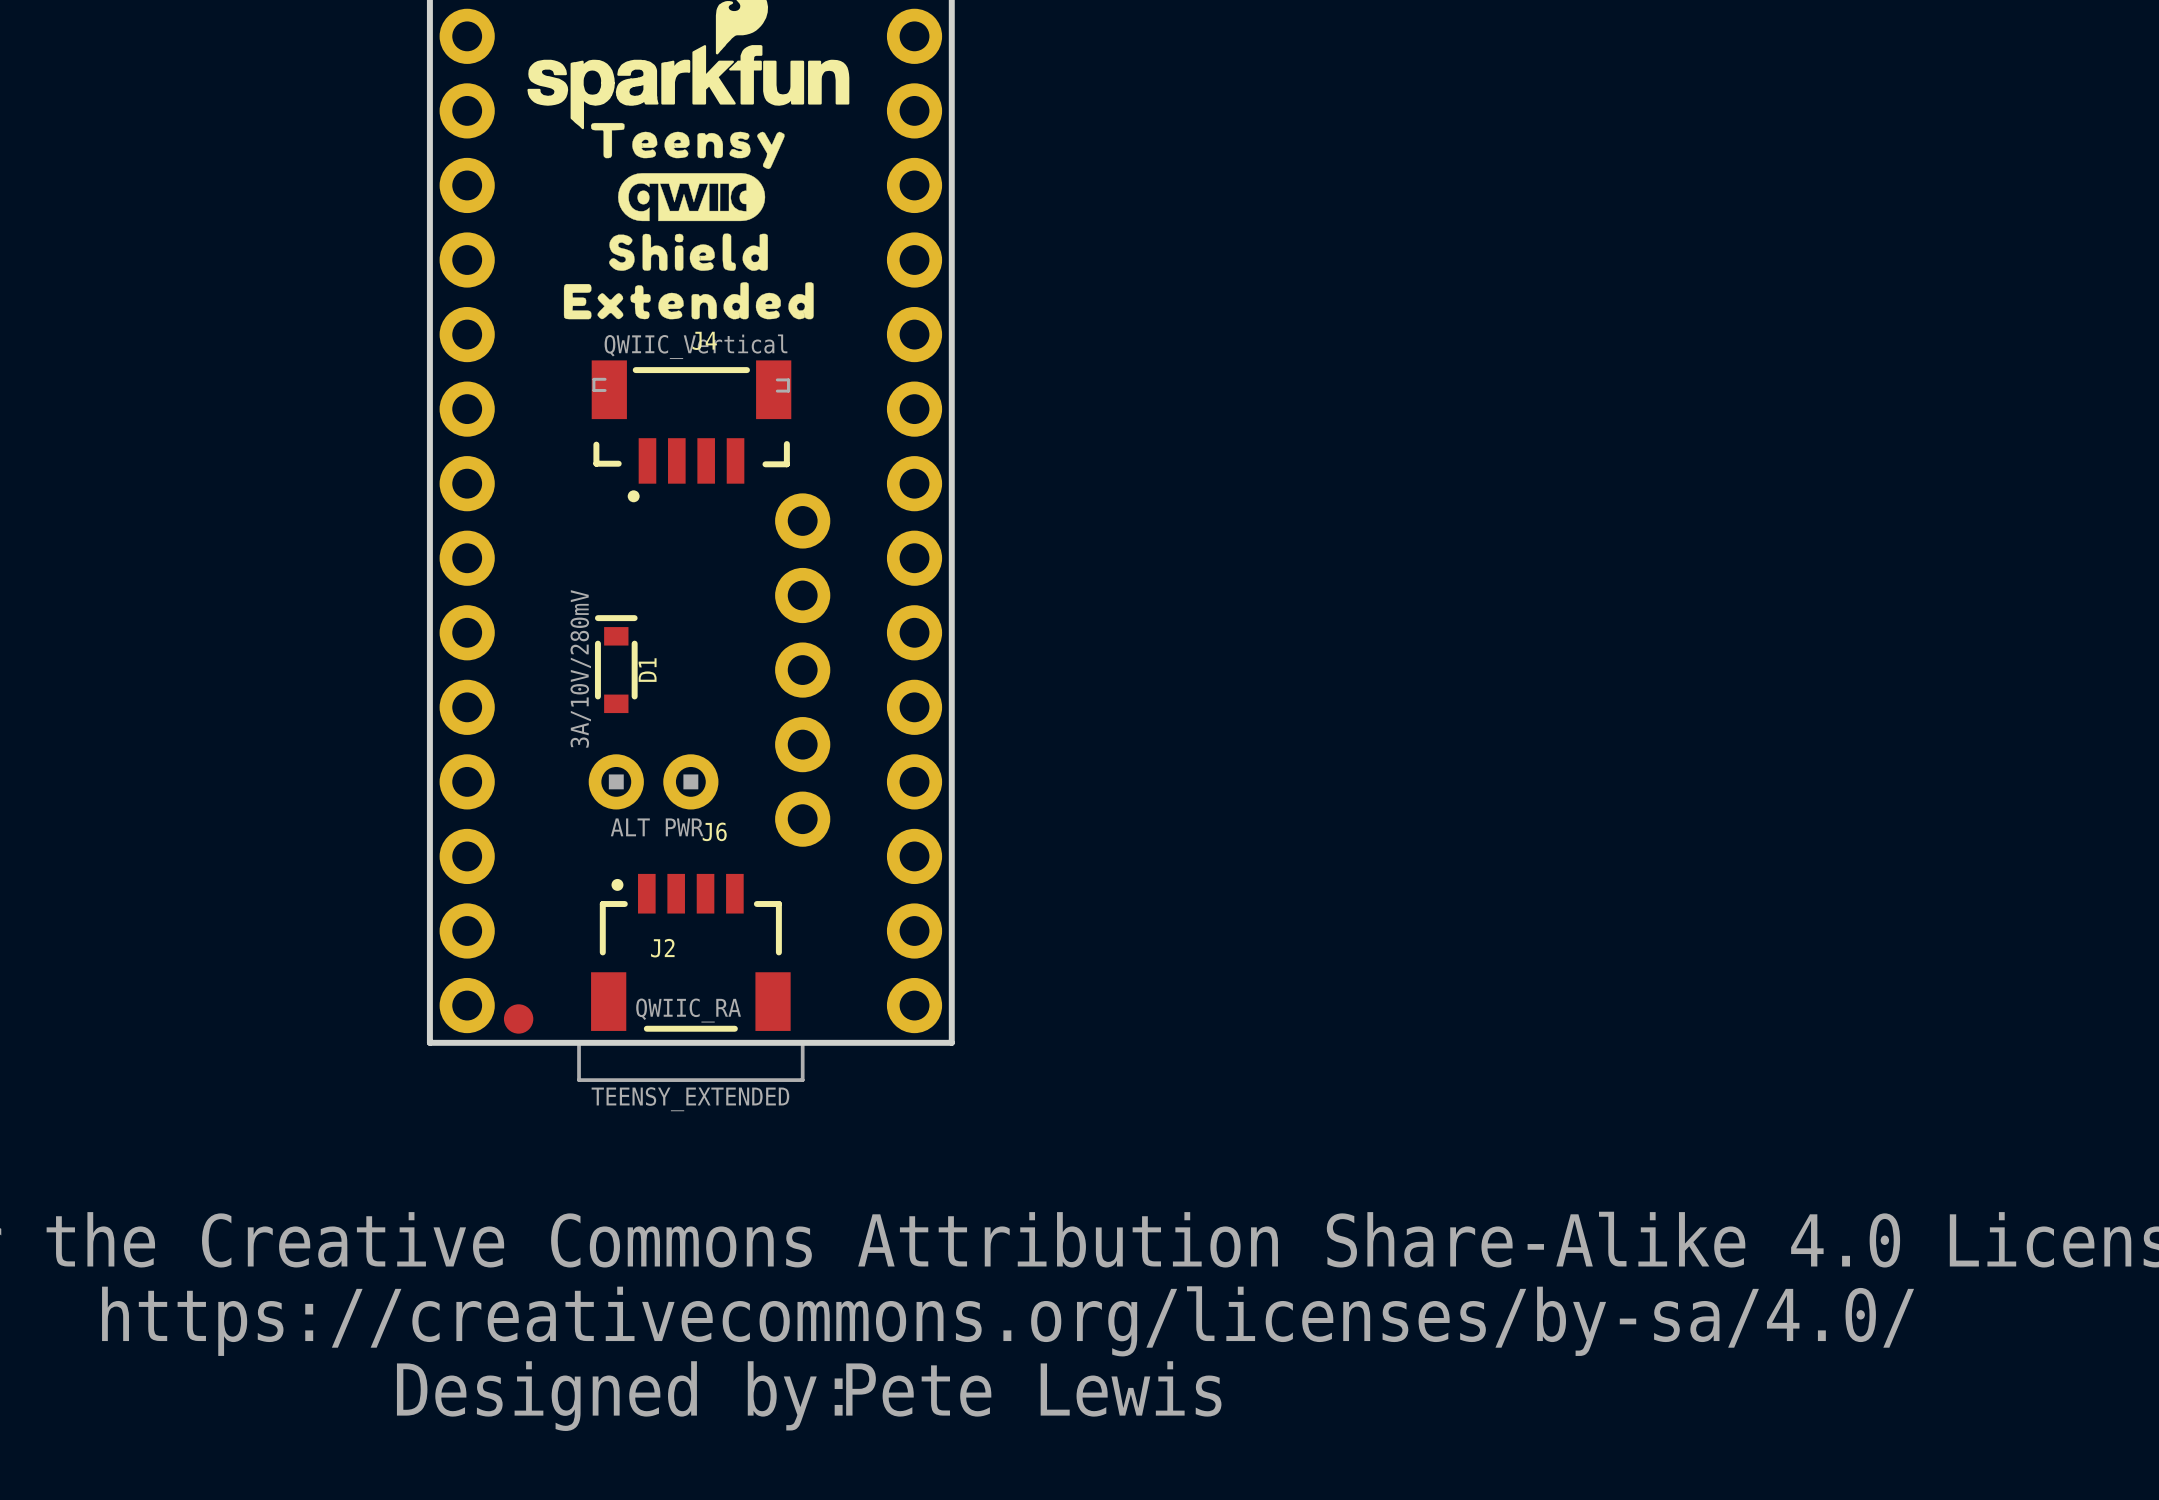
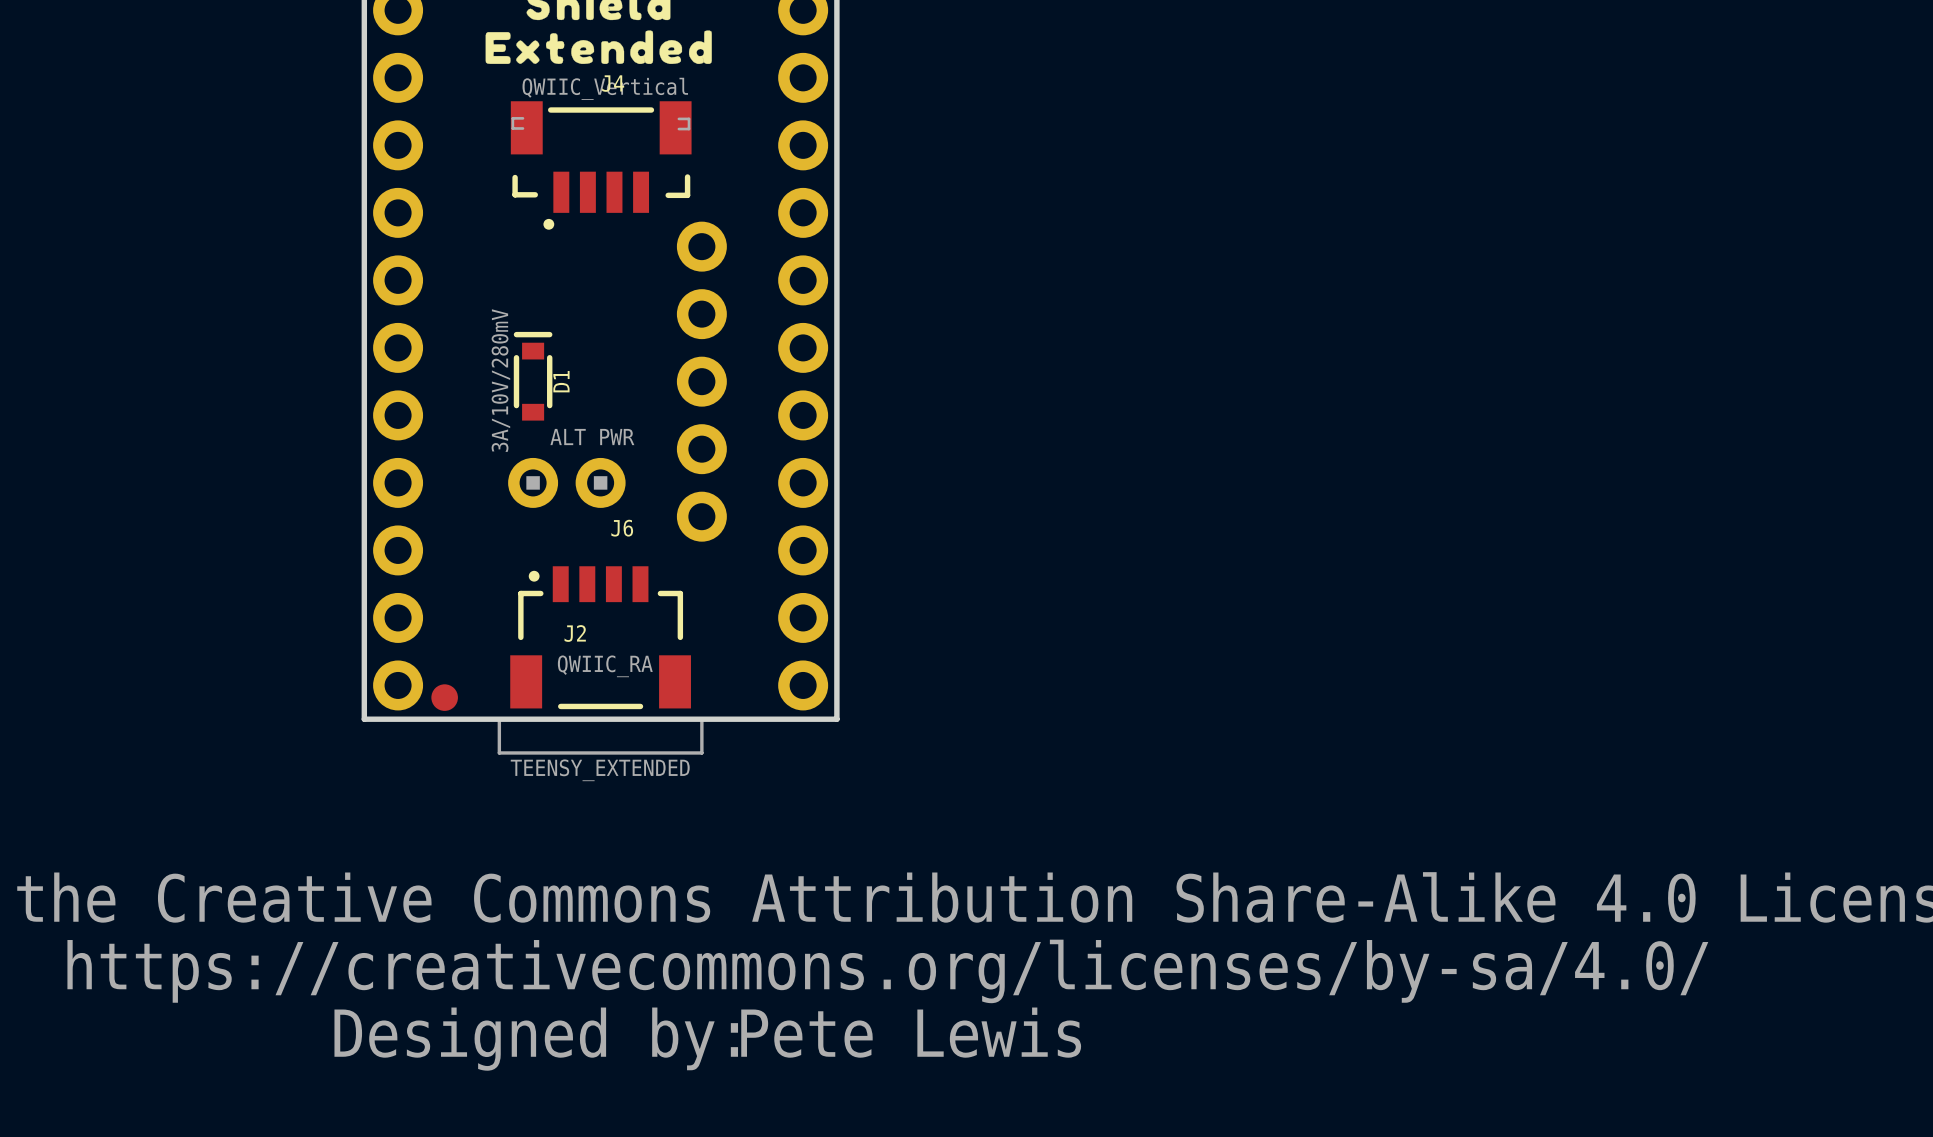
J6 value position: ALT PWR (657, 827) -> ALT PWR (592, 437)
J2 value position: QWIIC_RA (688, 1010) -> QWIIC_RA (605, 666)

